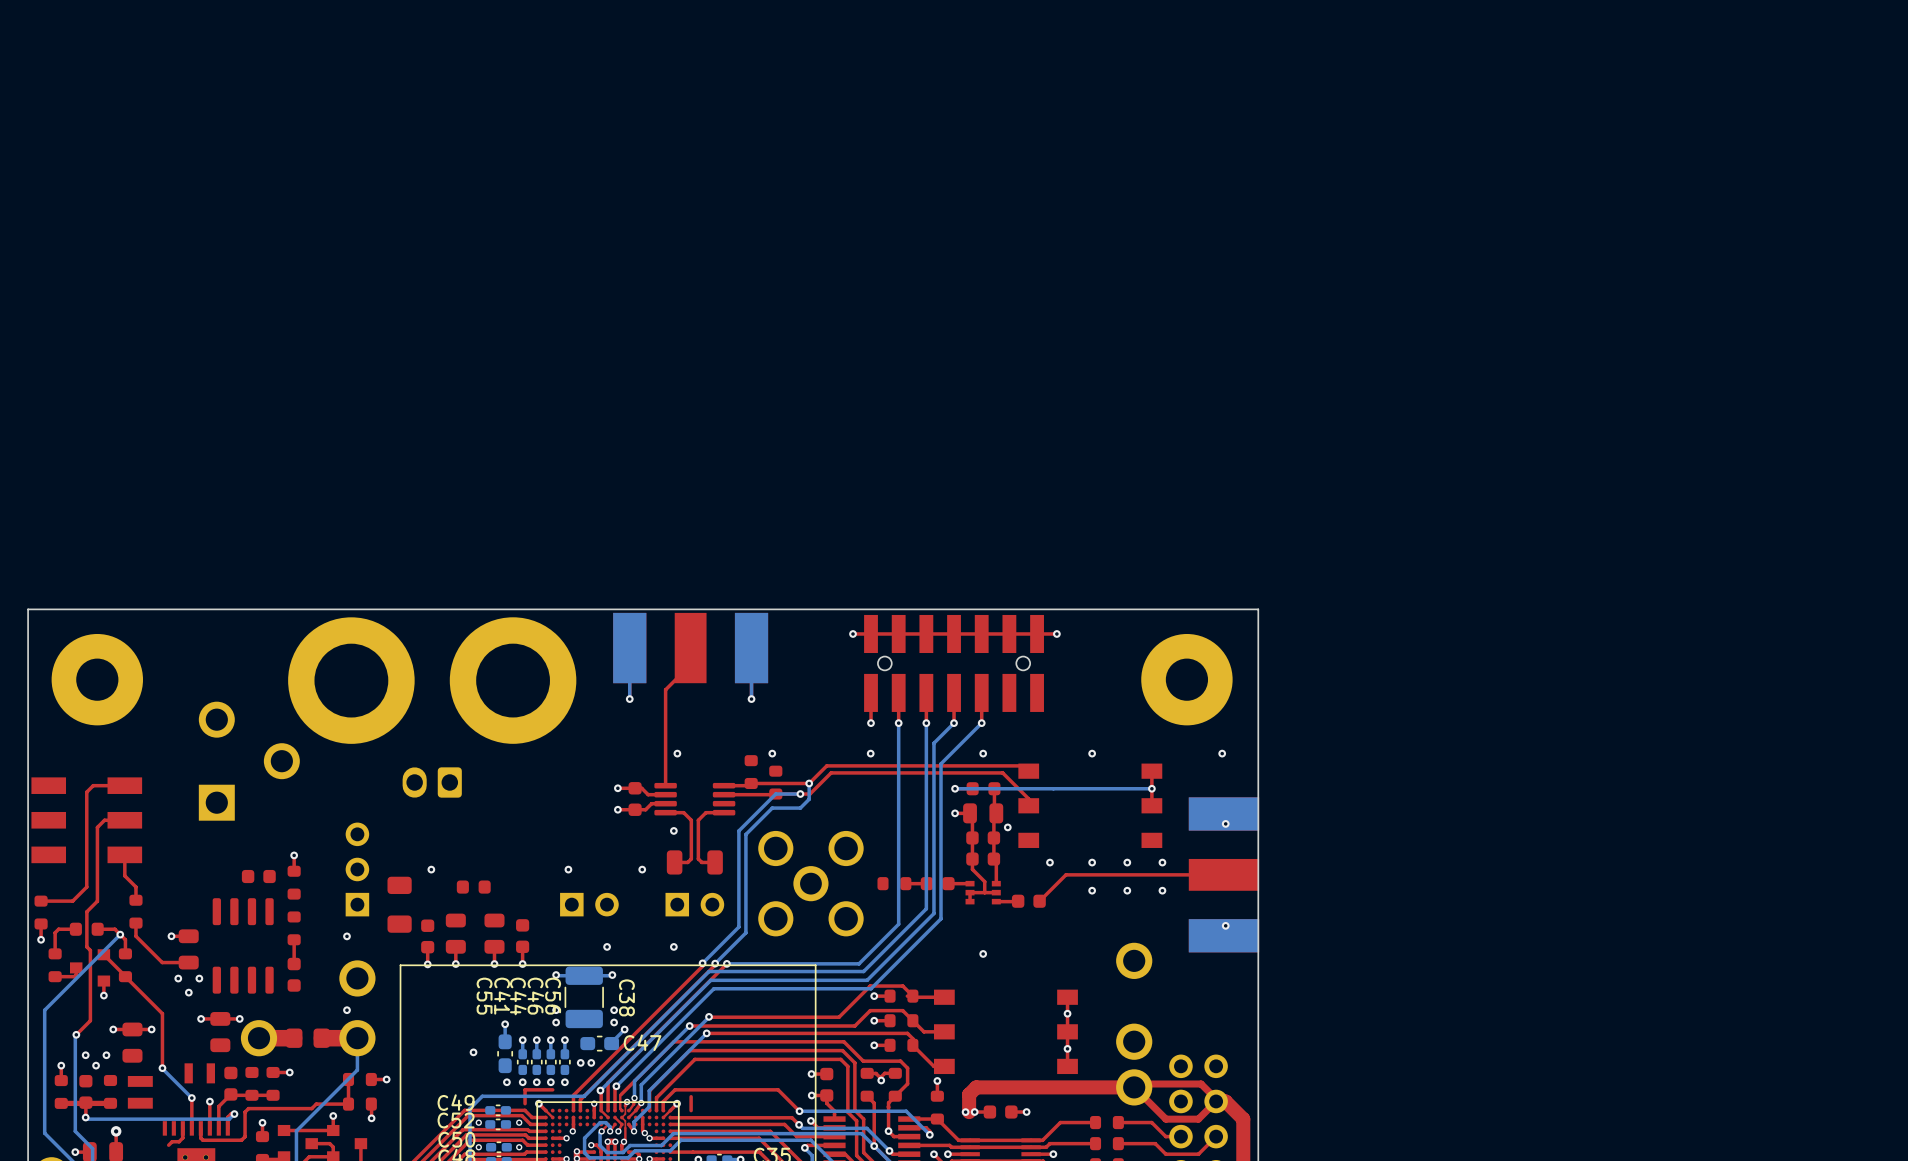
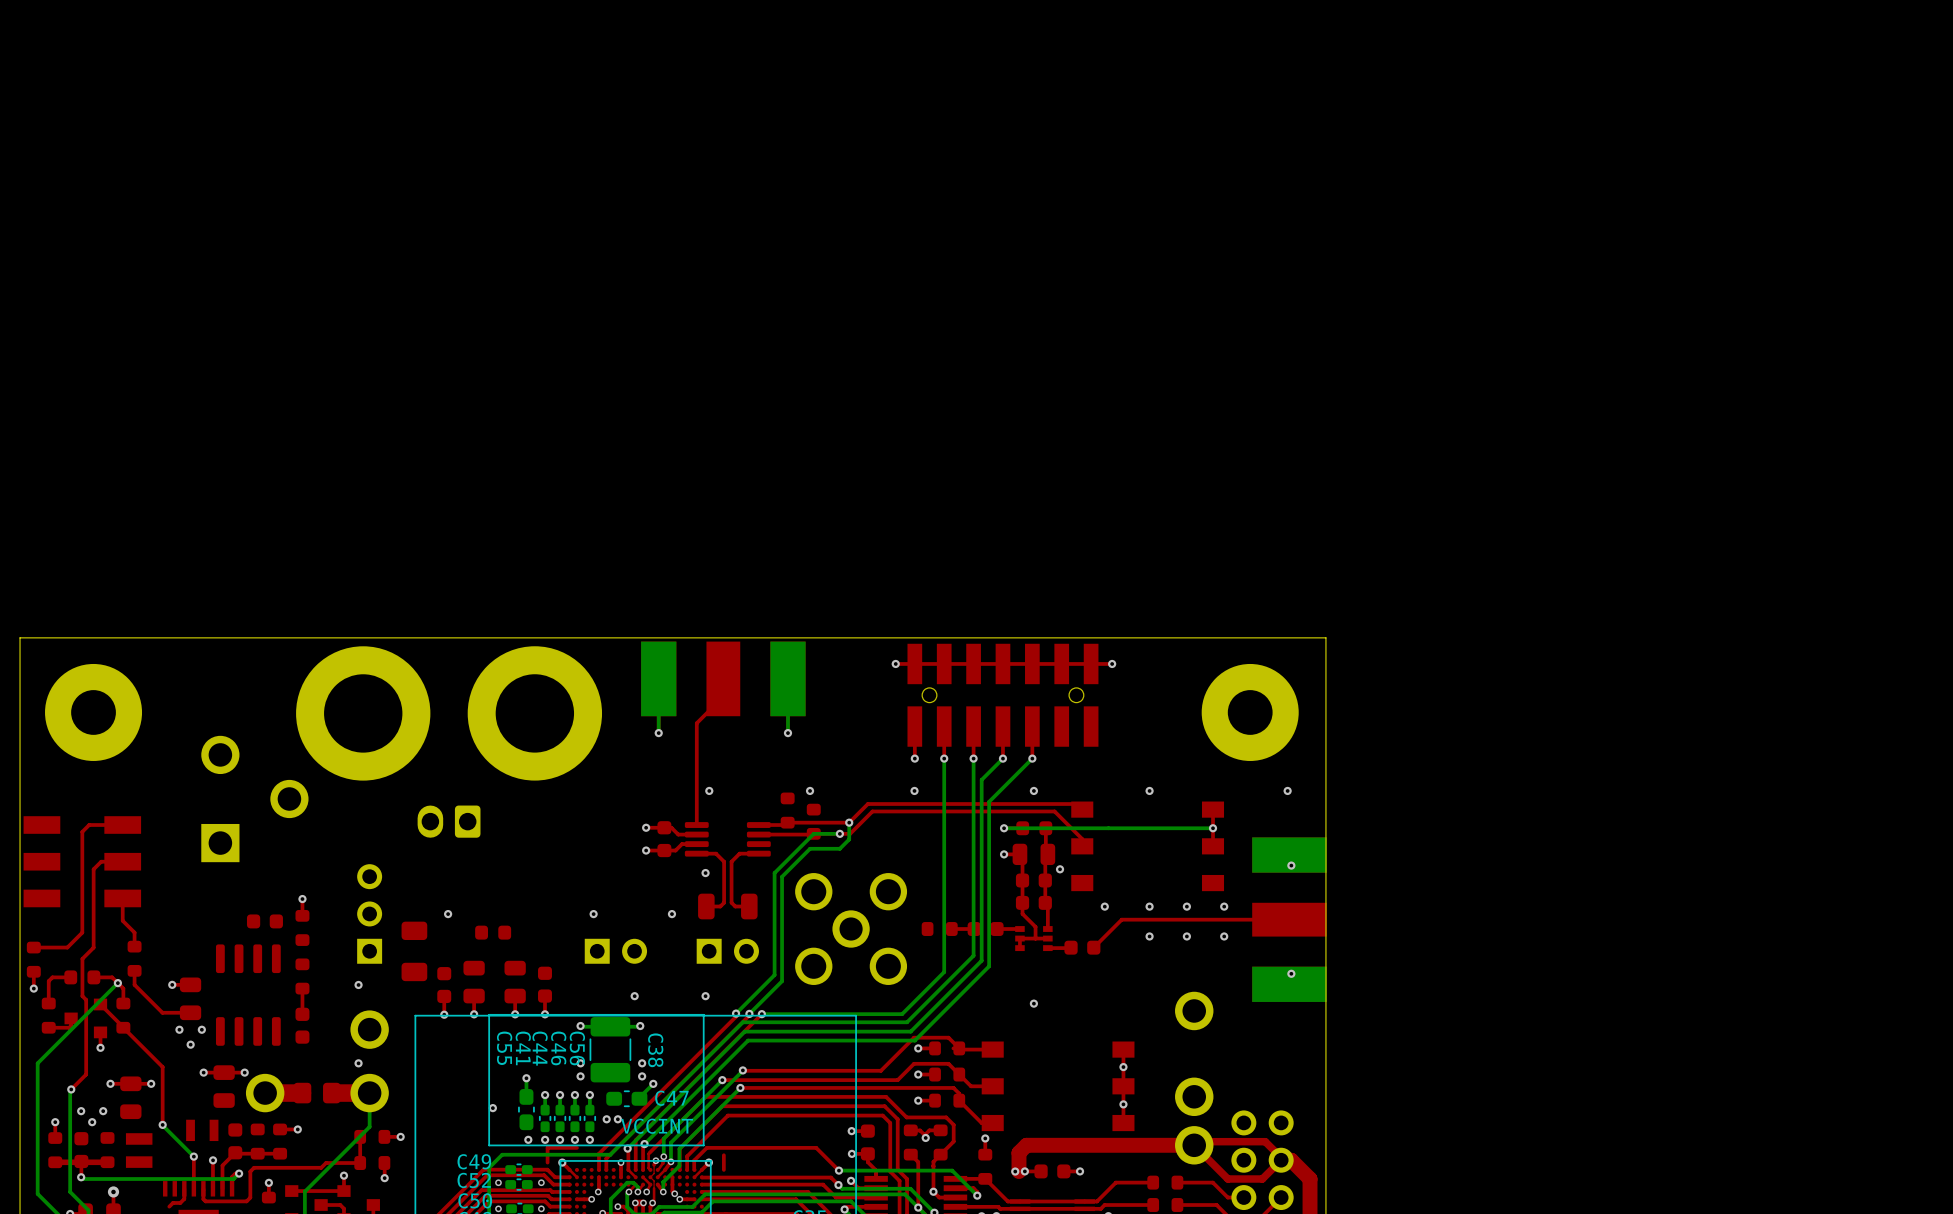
line: none -> (703, 1014) (489, 1014) (489, 1145) (703, 1145) (703, 1014)
text: none -> VCCINT (657, 1126)

